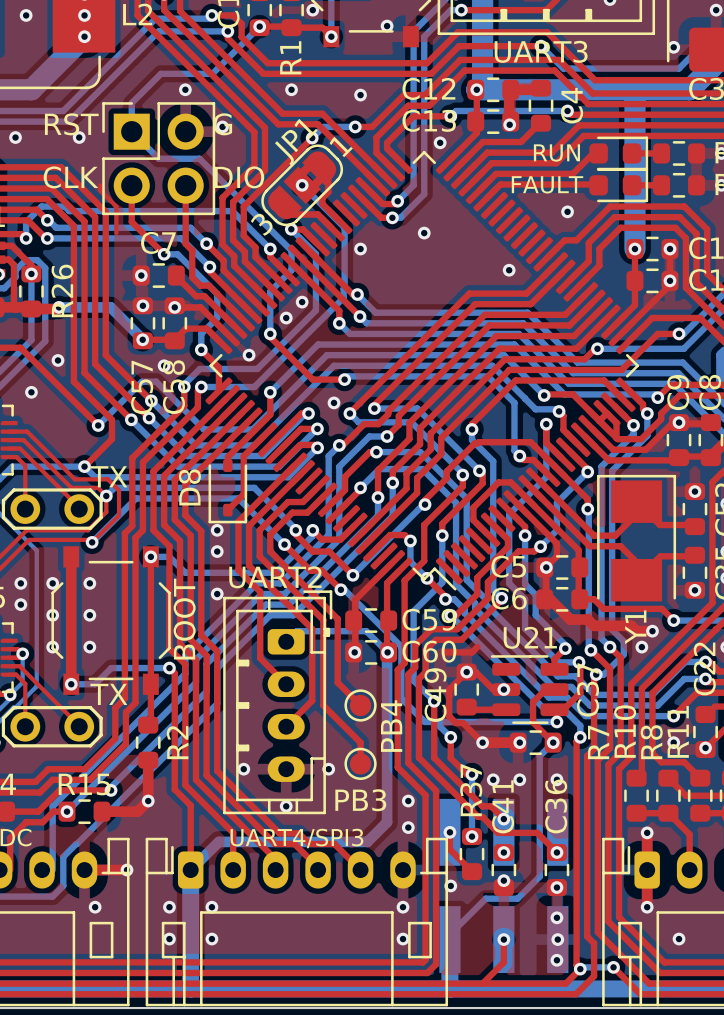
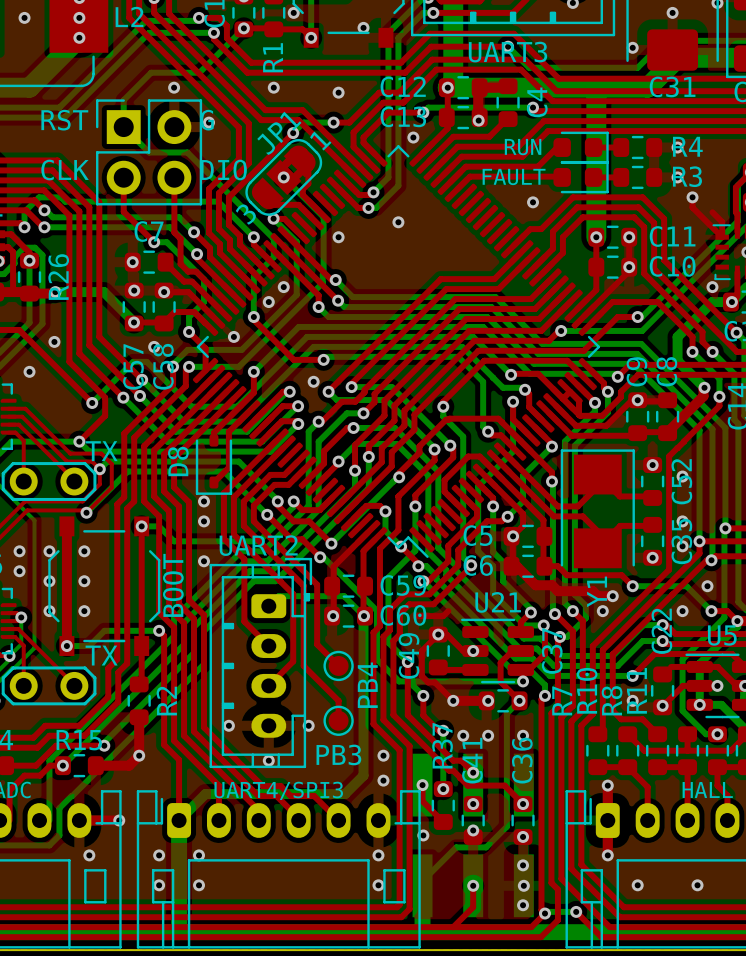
via: (15, 137) -> none
via: (79, 137) -> none
top track: (100, 185) (100, 190) (116, 206) (116, 233) -> none
via: (509, 270) -> none

